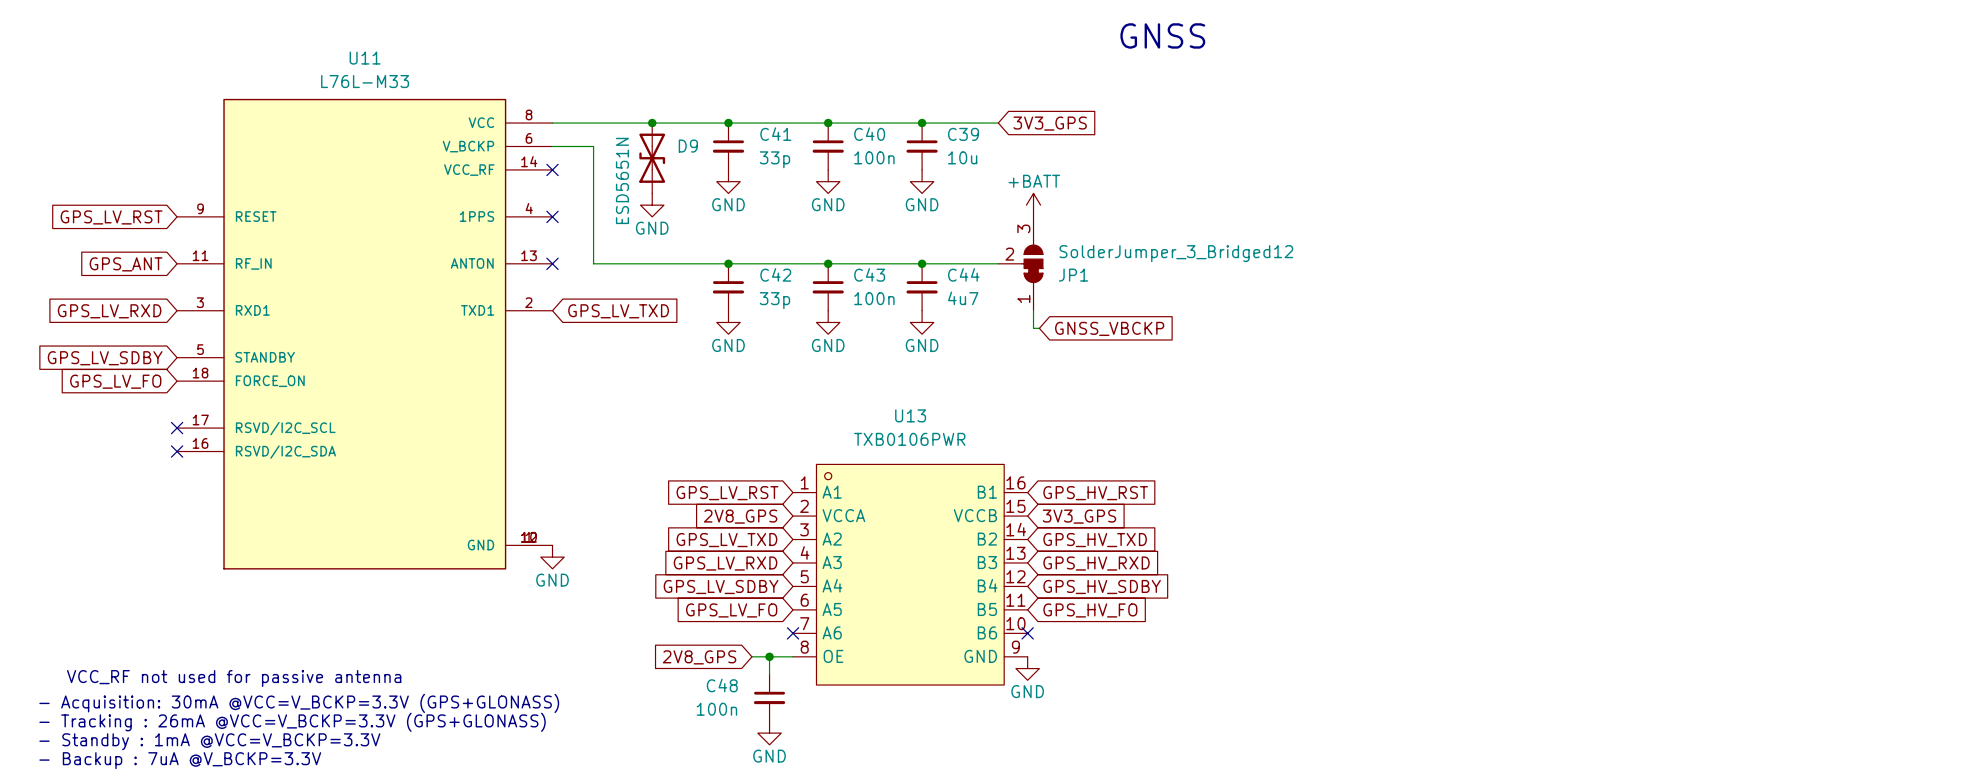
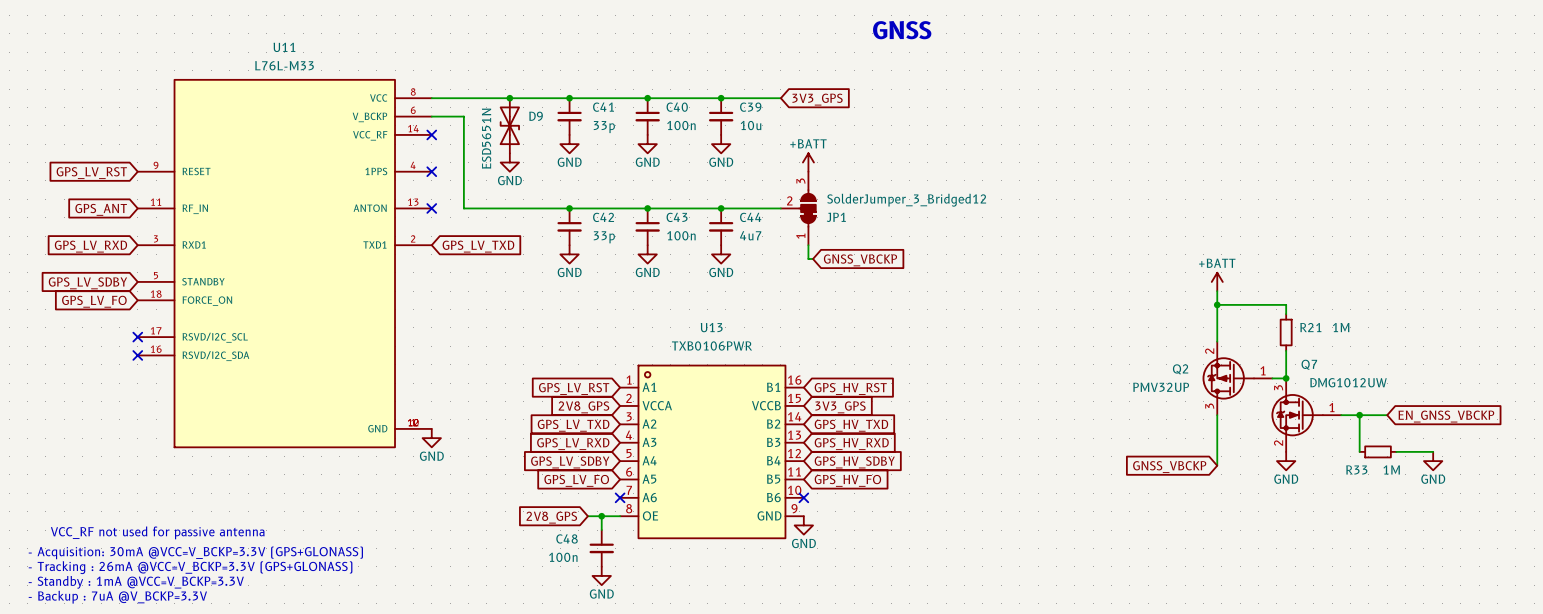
power symbol: none -> +BATT (1217, 281)
wire: none -> (1217, 291) (1217, 341)
wire: none -> (1217, 304) (1286, 304) (1286, 314)
junction: none -> (1217, 304)
R21: none -> 1M (1286, 332)
wire: none -> (1286, 350) (1286, 378) (1272, 378)
Q2: none -> PMV32UP (1237, 378)
junction: none -> (1286, 378)
wire: none -> (1217, 415) (1217, 465)
Q7: none -> DMG1012UW (1306, 415)
wire: none -> (1341, 415) (1387, 415)
wire: none -> (1359, 415) (1359, 451)
junction: none -> (1359, 415)
global label: none -> EN_GNSS_VBCKP (1446, 416)
R33: none -> 1M (1378, 451)
wire: none -> (1396, 451) (1433, 451)
power symbol: none -> GND (1286, 461)
power symbol: none -> GND (1433, 461)
global label: none -> GNSS_VBCKP (1169, 467)

